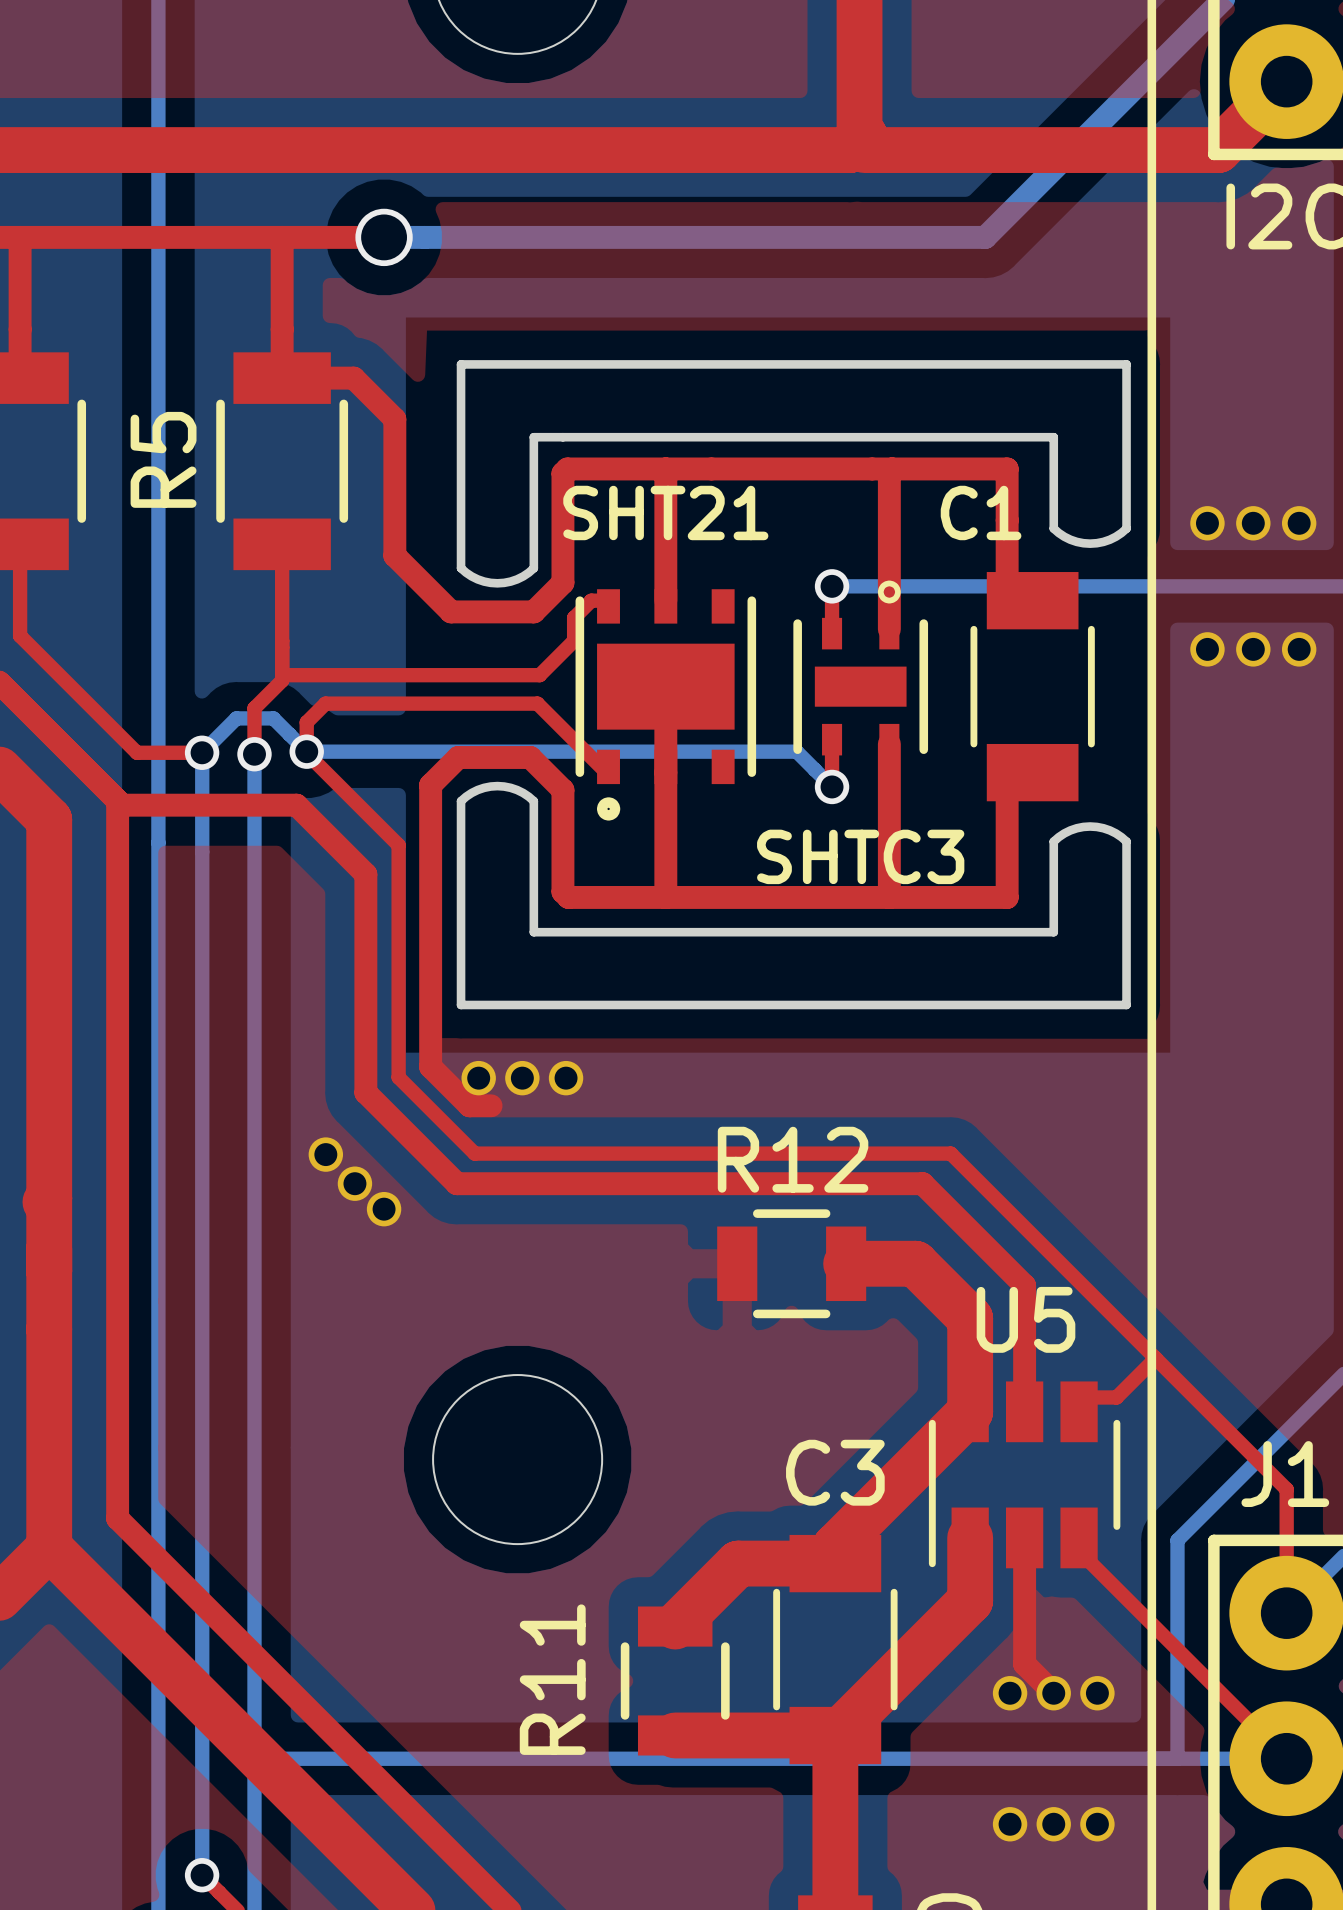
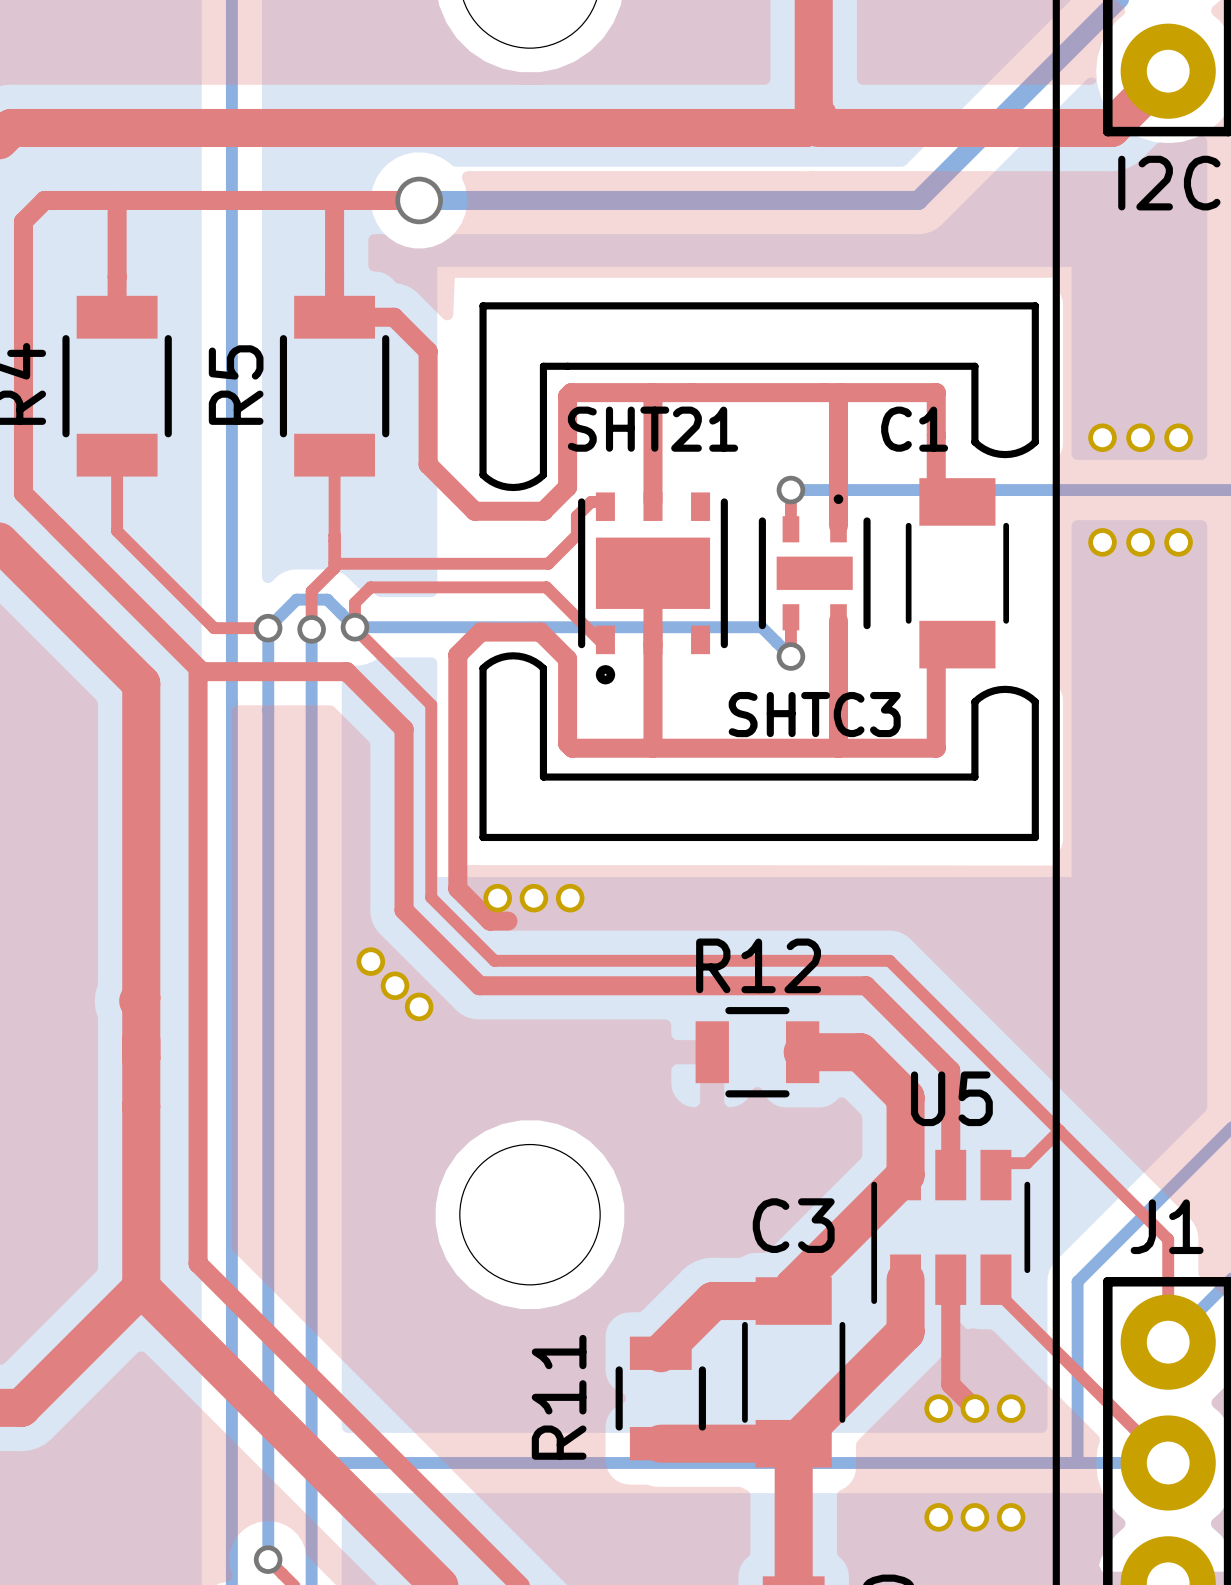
part footprint: [793, 580, 929, 756] -> [758, 494, 871, 631]

